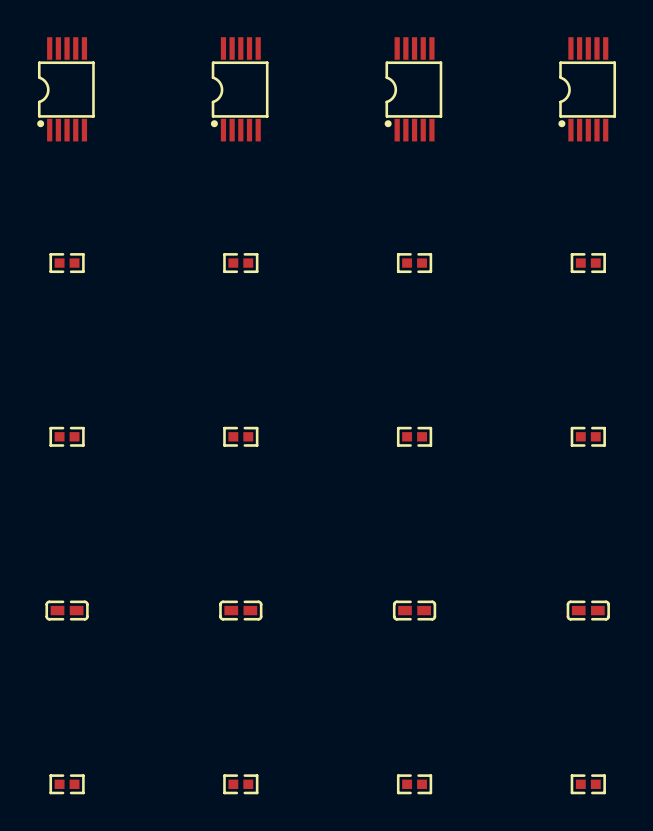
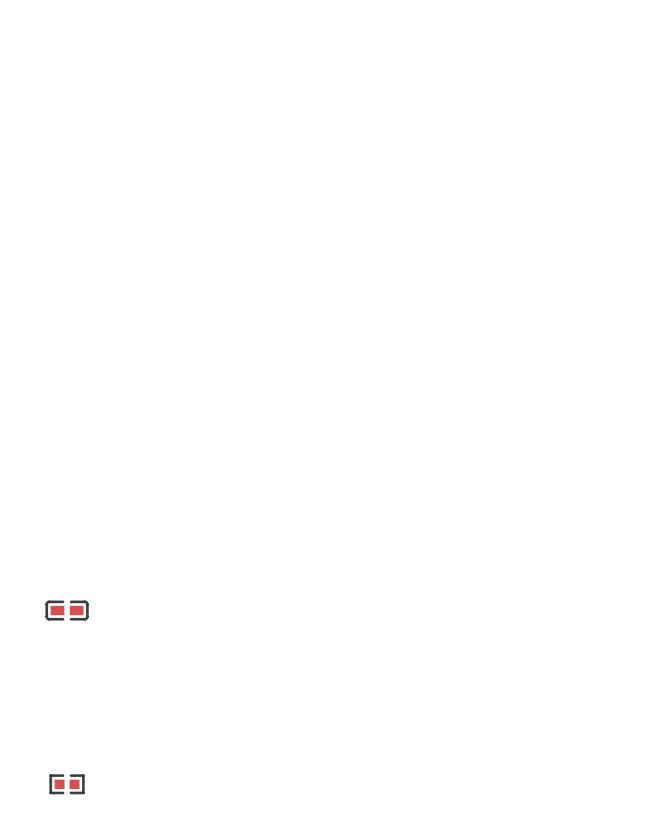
part: (65, 89) -> none
part: (239, 89) -> none
part: (413, 89) -> none
part: (587, 89) -> none
part: (67, 263) -> none
part: (240, 263) -> none
part: (414, 263) -> none
part: (588, 263) -> none
part: (67, 436) -> none
part: (240, 436) -> none
part: (414, 436) -> none
part: (588, 436) -> none
part: (240, 610) -> none
part: (414, 610) -> none
part: (588, 610) -> none
part: (240, 784) -> none
part: (414, 784) -> none
part: (588, 784) -> none

